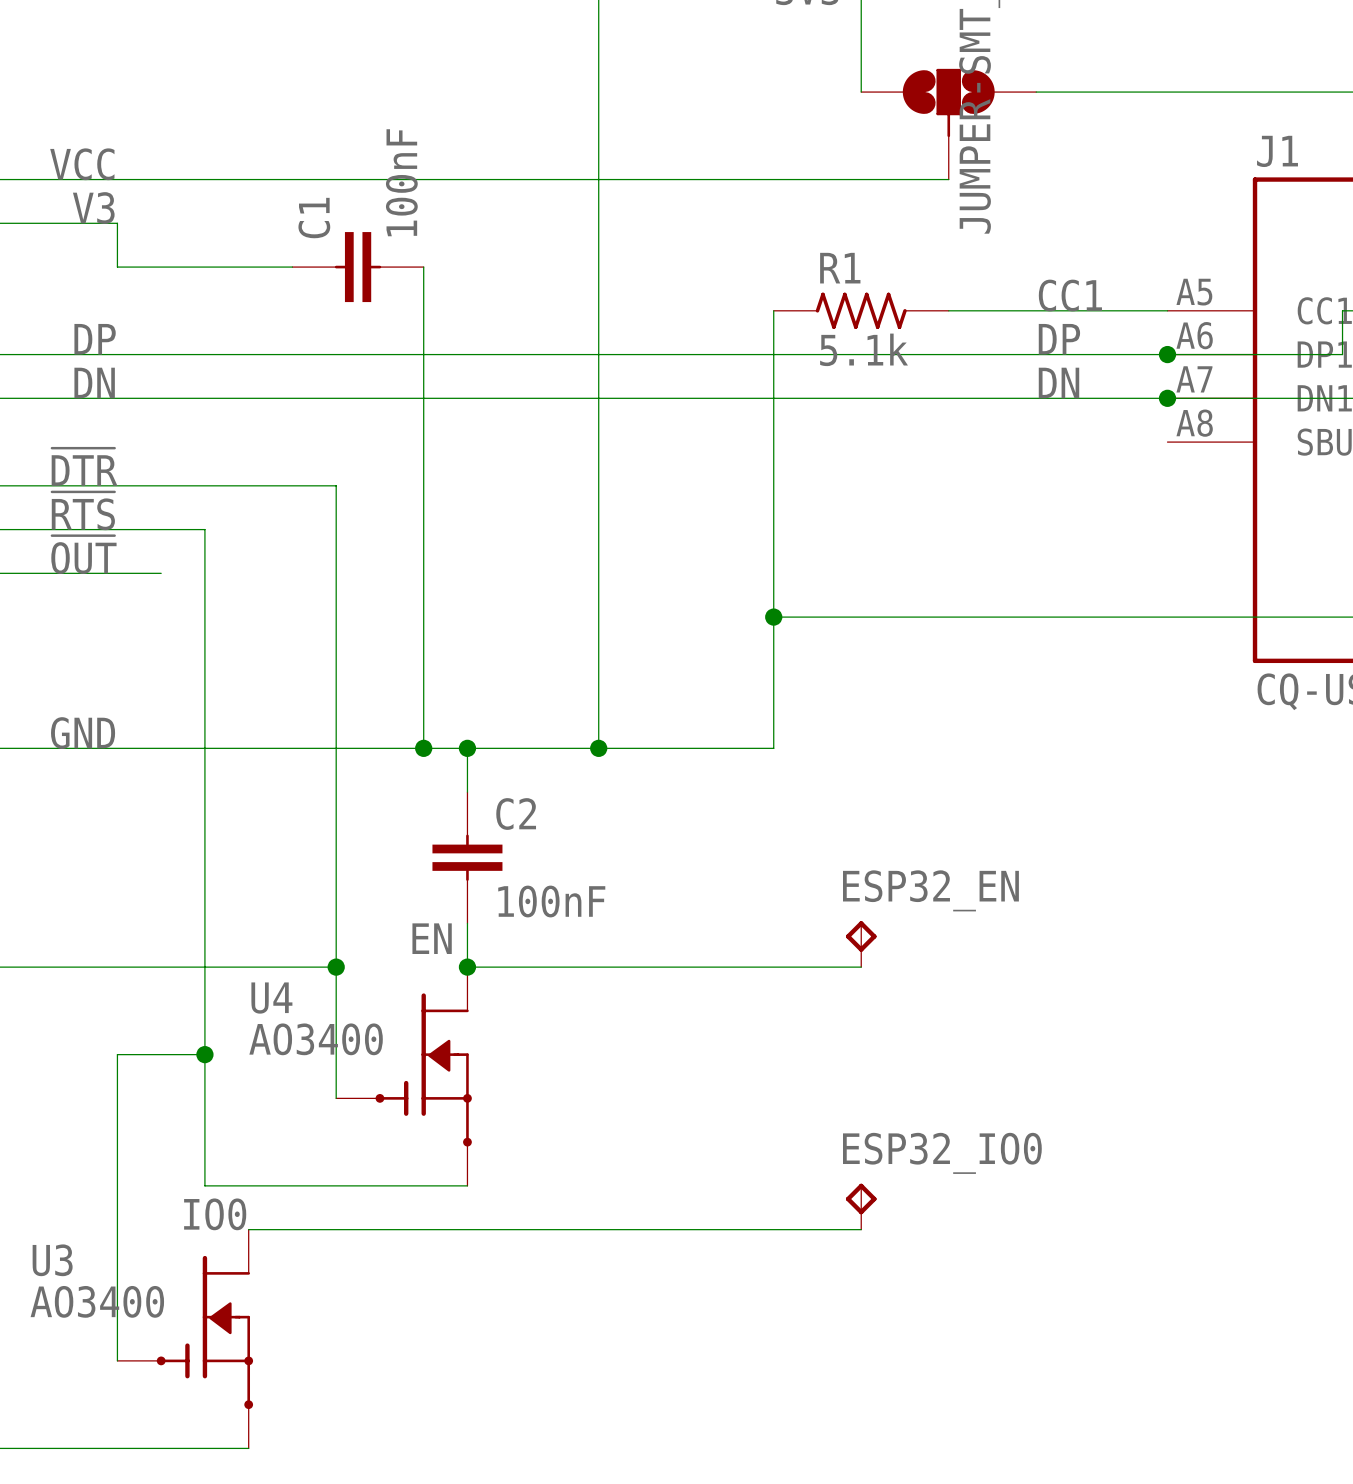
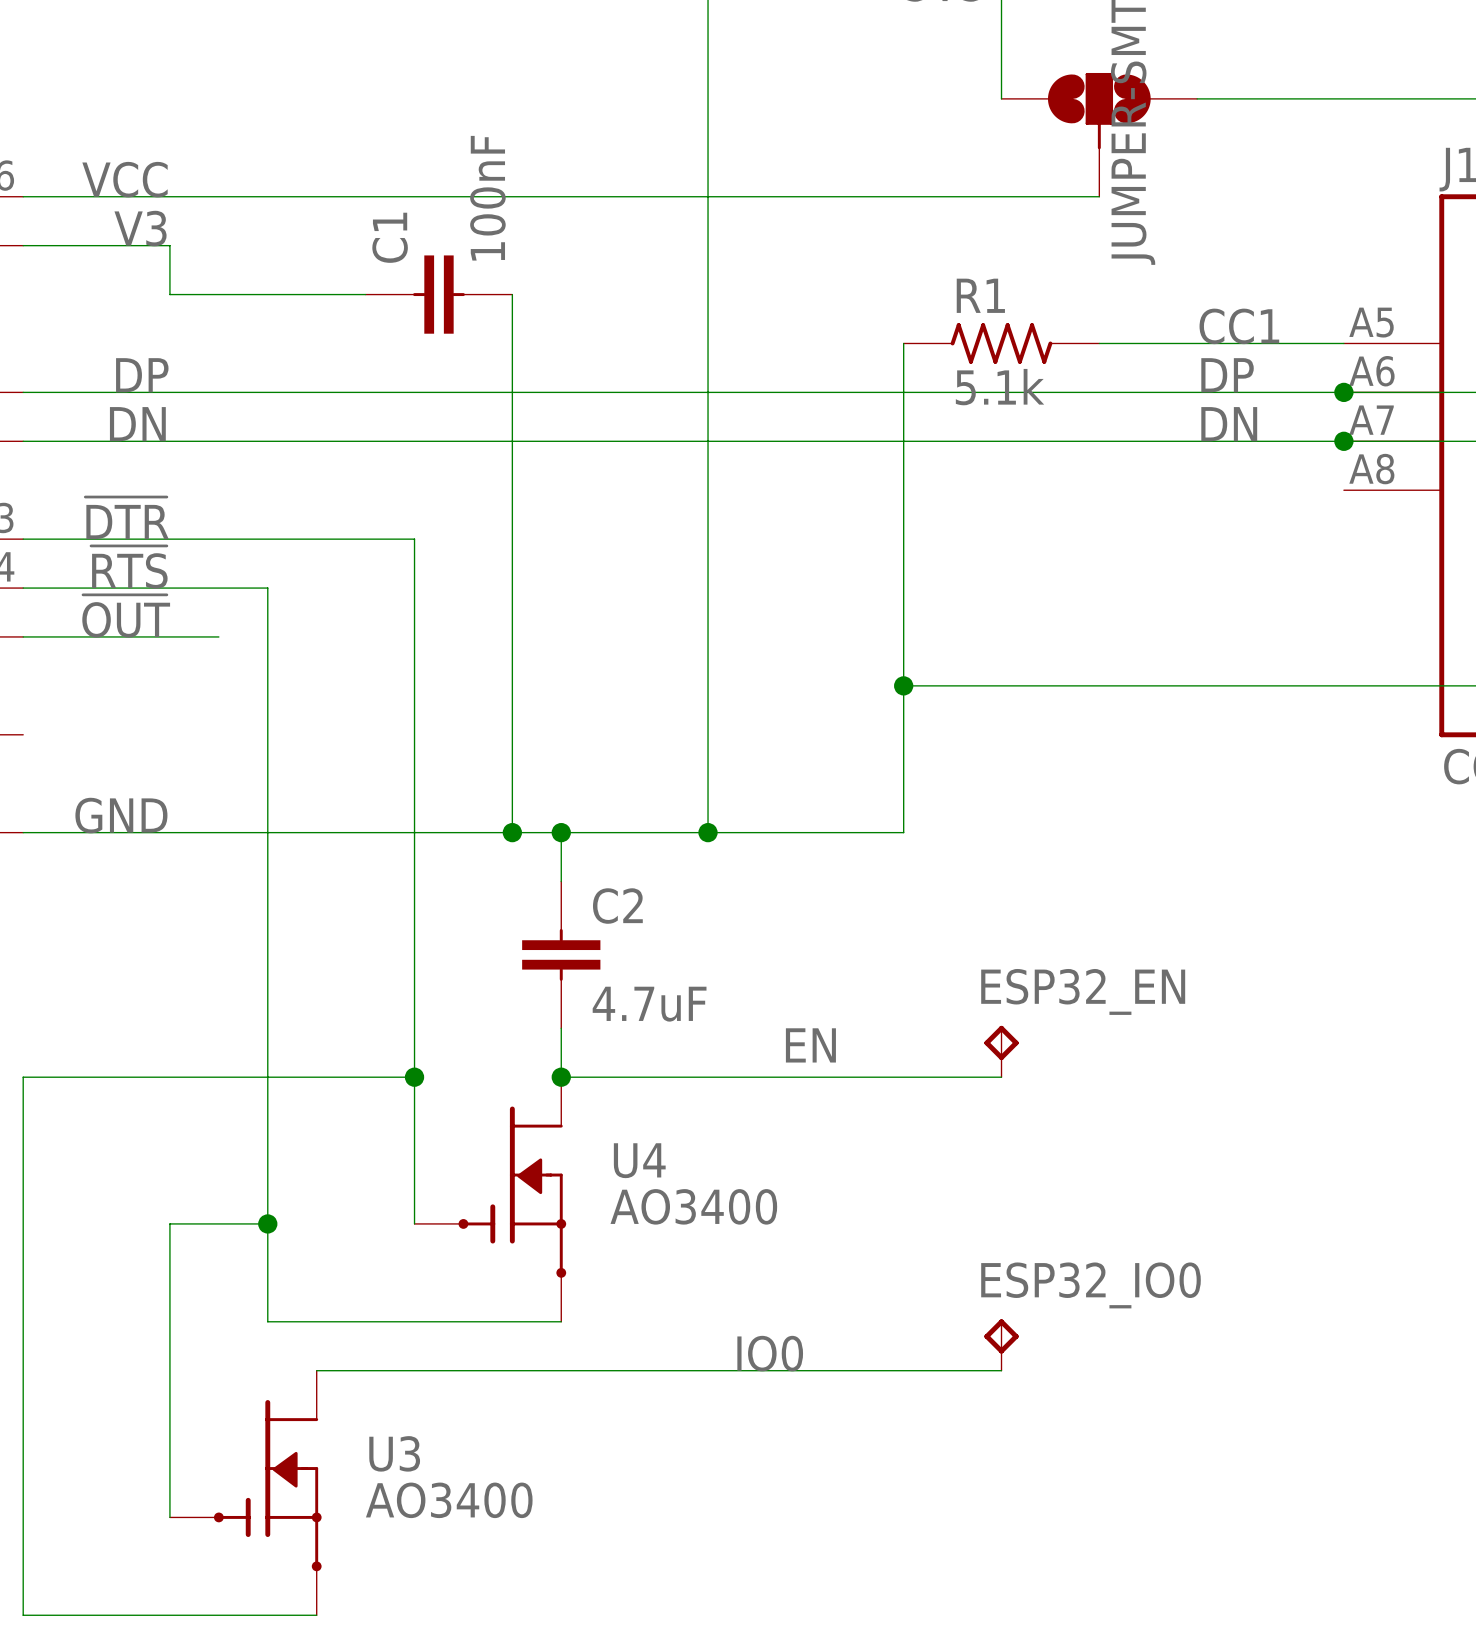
C2 value: 100nF (551, 901) -> 4.7uF (649, 1004)
label position: EN (432, 938) -> EN (810, 1045)
U4 name position: U4 (271, 998) -> U4 (639, 1160)
U4 value position: AO3400 (316, 1039) -> AO3400 (693, 1206)
wire: (204, 1054) (117, 1054) (117, 1098) -> (267, 1223) (169, 1223)
junction position: (204, 1054) -> (267, 1223)
label: IO0 (215, 1214) -> none
label: none -> IO0 (770, 1353)
U3 name position: U3 (52, 1260) -> U3 (394, 1453)
U3 value position: AO3400 (97, 1301) -> AO3400 (449, 1500)

